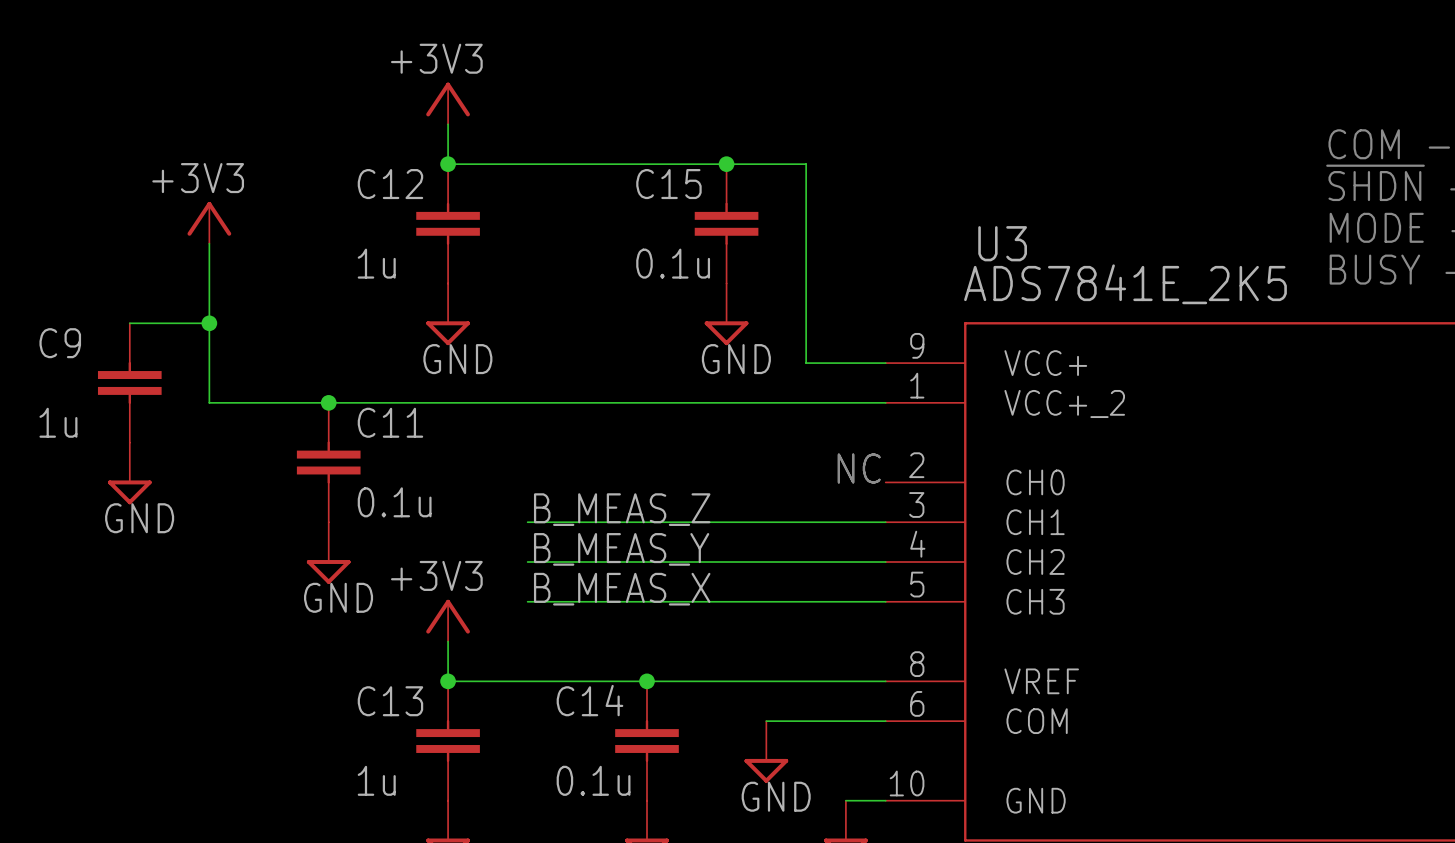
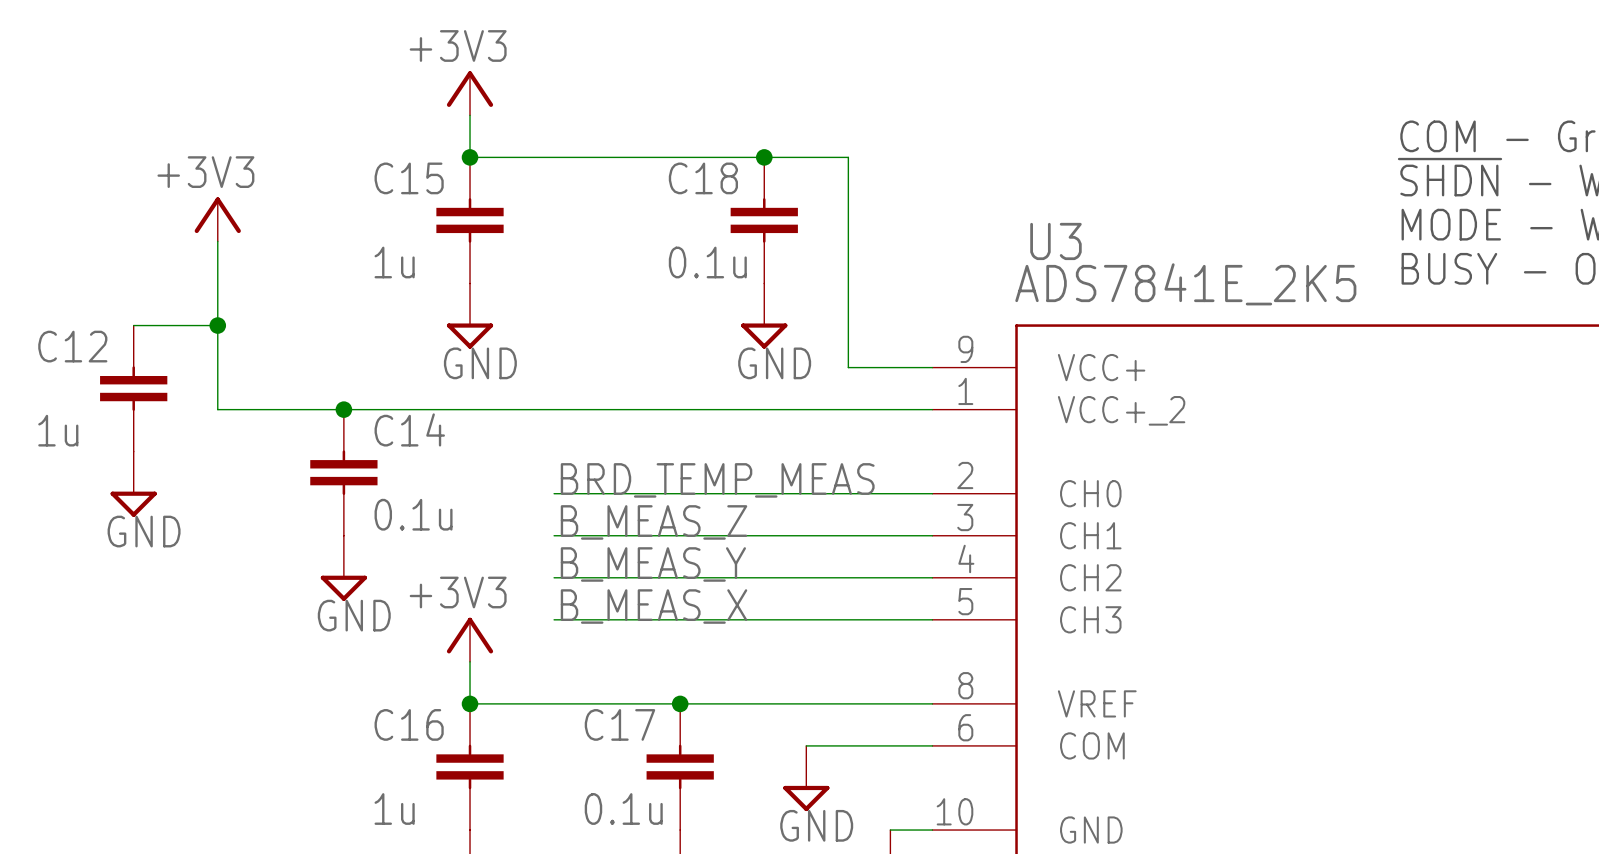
C12 name: C12 (390, 184) -> C15 (409, 178)
C15 name: C15 (668, 184) -> C18 (703, 178)
C9 name: C9 (60, 343) -> C12 (72, 346)
C11 name: C11 (390, 422) -> C14 (409, 429)
text: NC (859, 468) -> none
label: none -> BRD_TEMP_MEAS (717, 480)
wire: none -> (554, 493) (932, 493)
C14 name: C14 (589, 700) -> C17 (619, 724)
C13 name: C13 (390, 701) -> C16 (409, 724)

